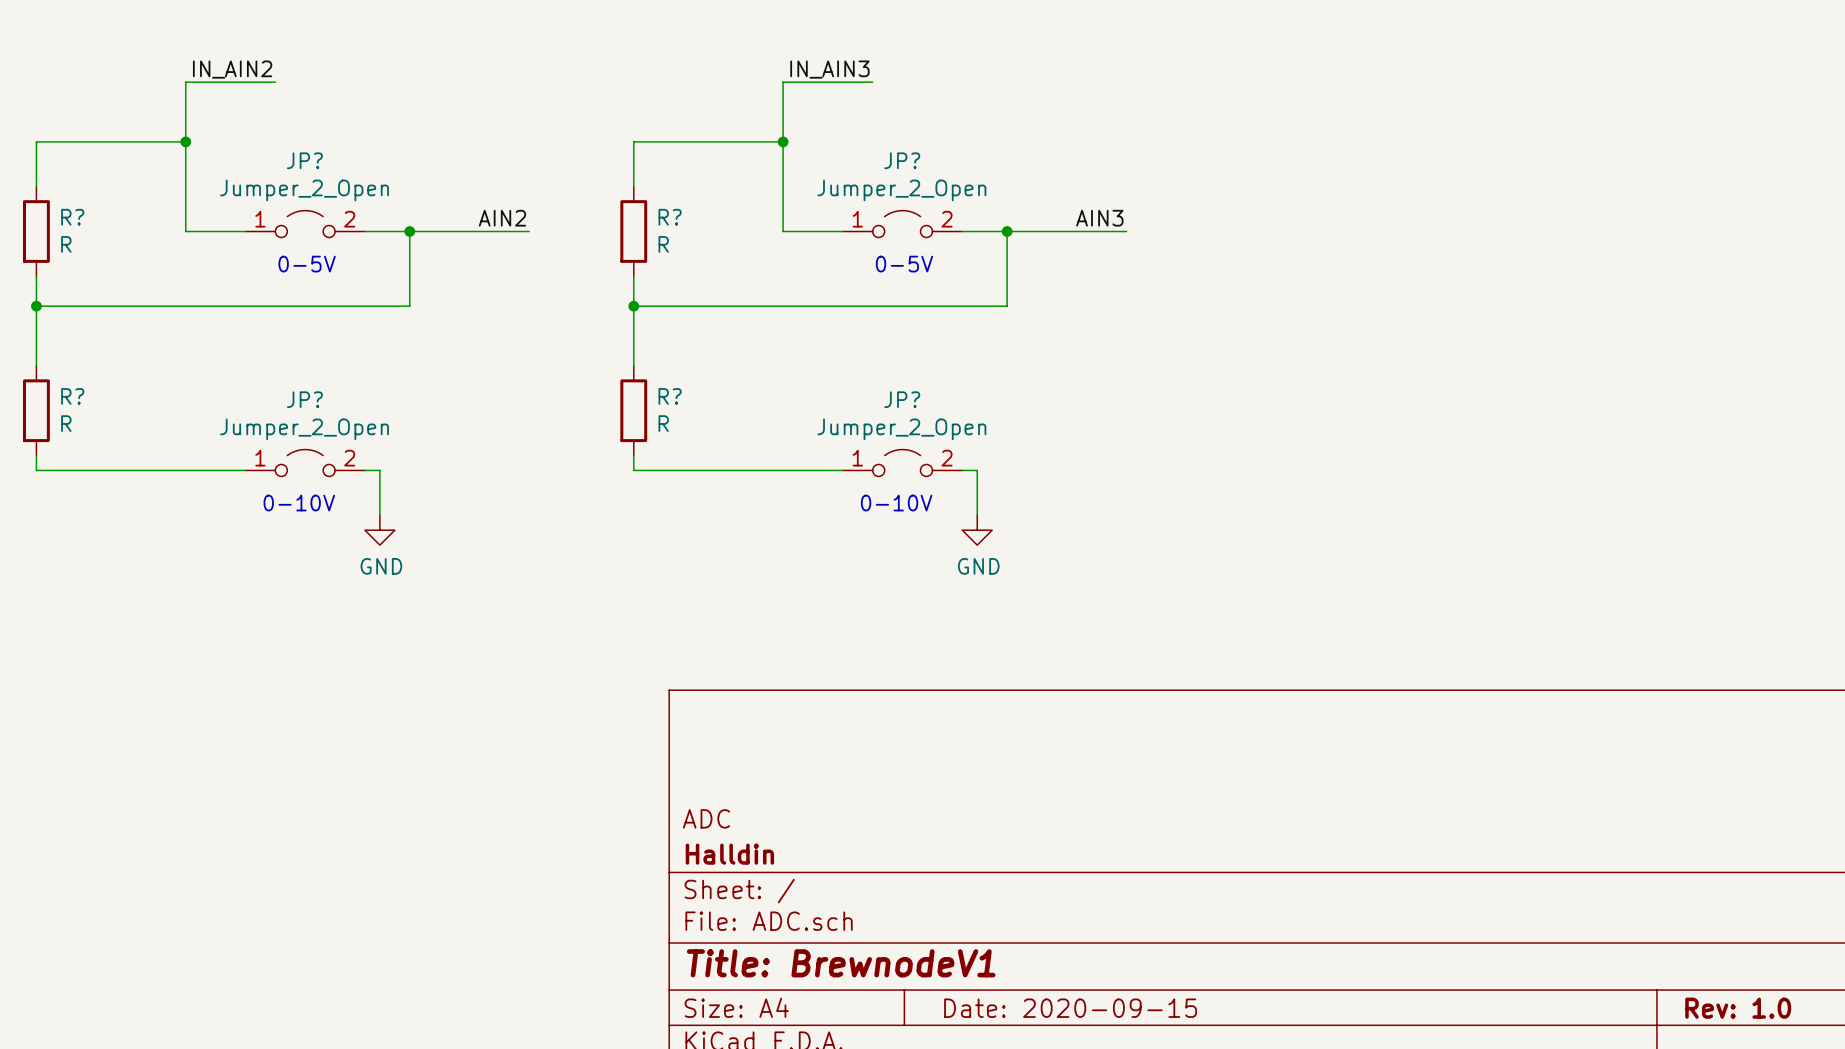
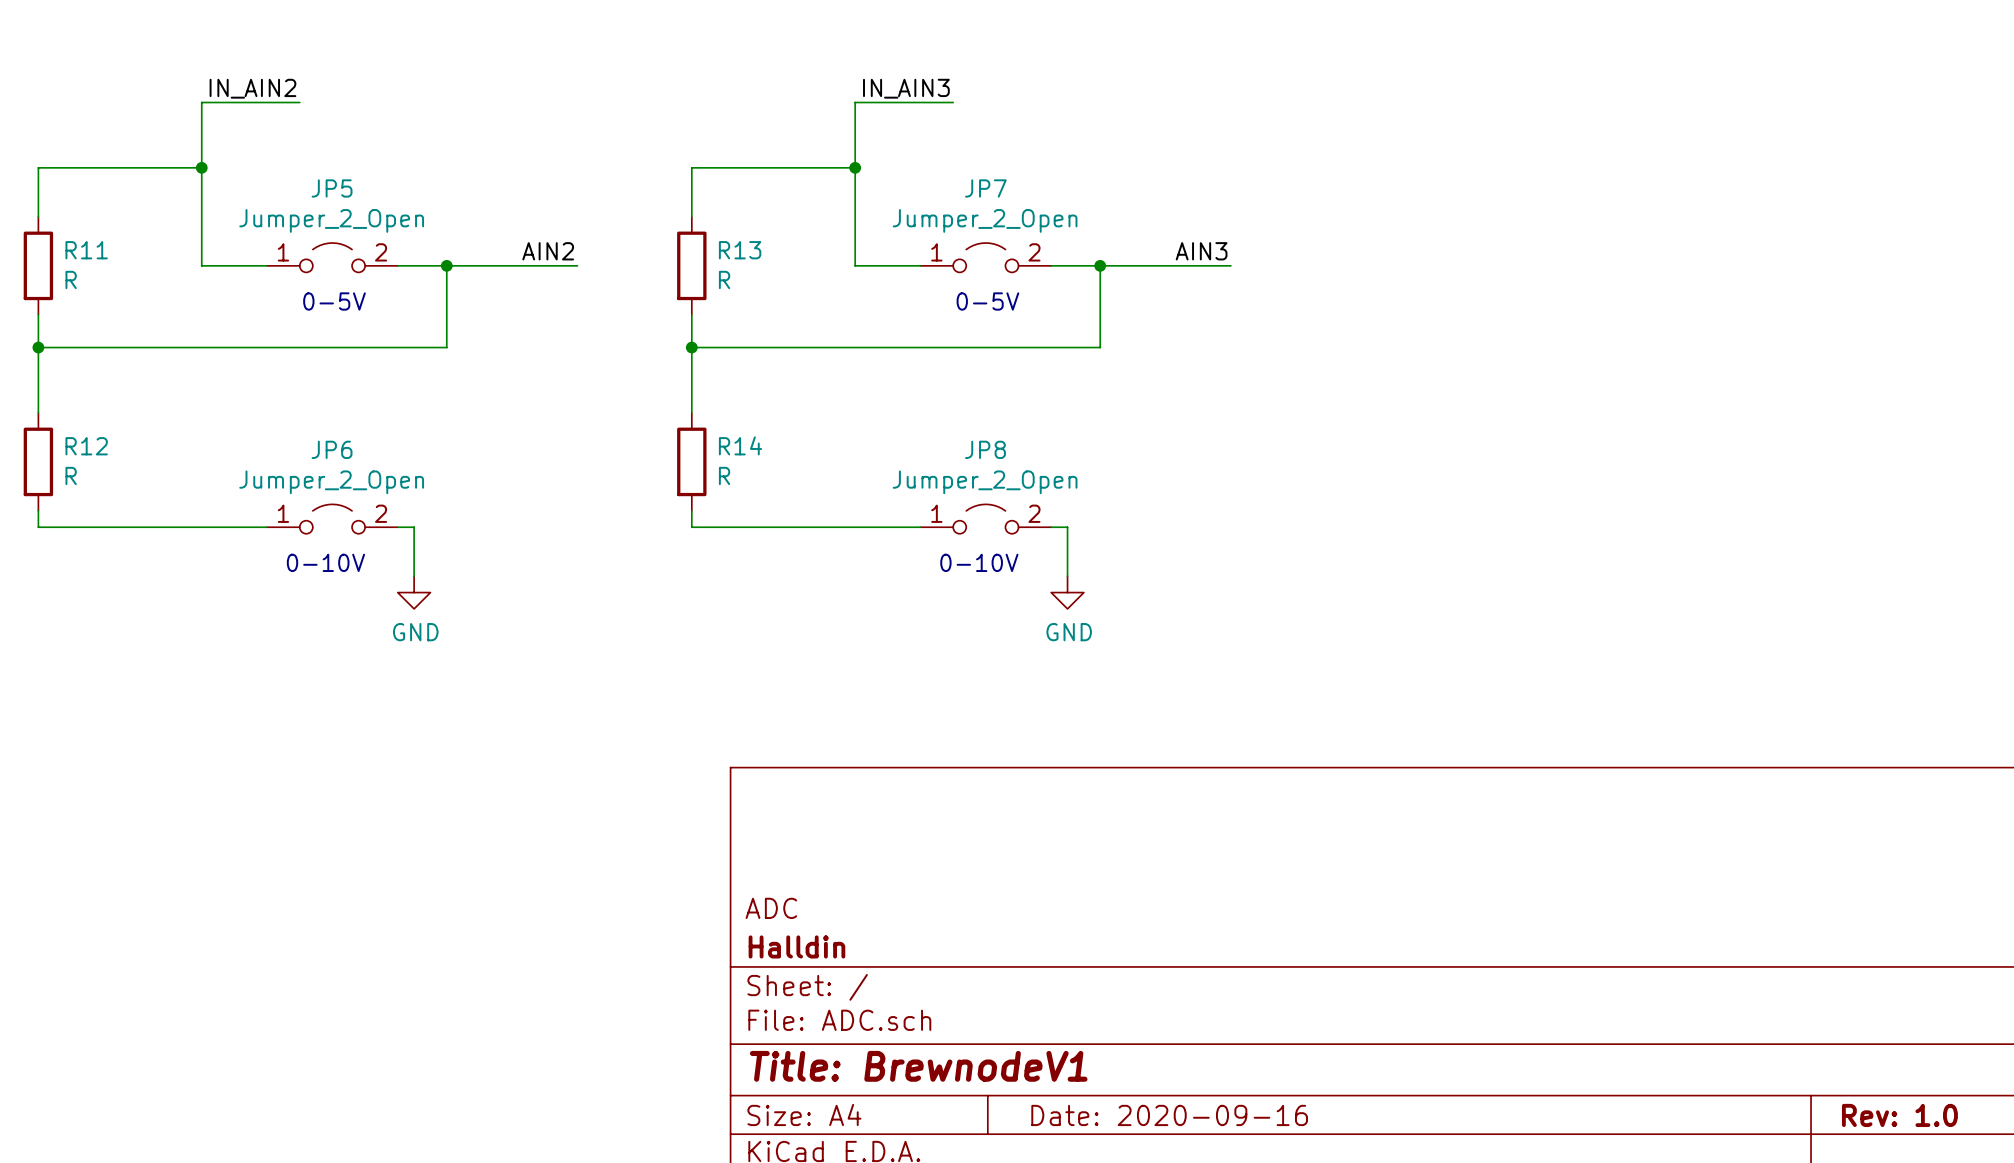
JP? name: JP? (304, 160) -> JP5 (332, 188)
JP? name: JP? (902, 160) -> JP7 (985, 188)
R? name: R? (72, 217) -> R11 (86, 250)
R? name: R? (670, 217) -> R13 (740, 250)
R? name: R? (72, 396) -> R12 (86, 446)
R? name: R? (670, 396) -> R14 (740, 445)
JP? name: JP? (304, 399) -> JP6 (332, 449)
JP? name: JP? (902, 399) -> JP8 (985, 449)
title block: Date: 2020-09-15 (1070, 1008) -> Date: 2020-09-16 (1169, 1115)

